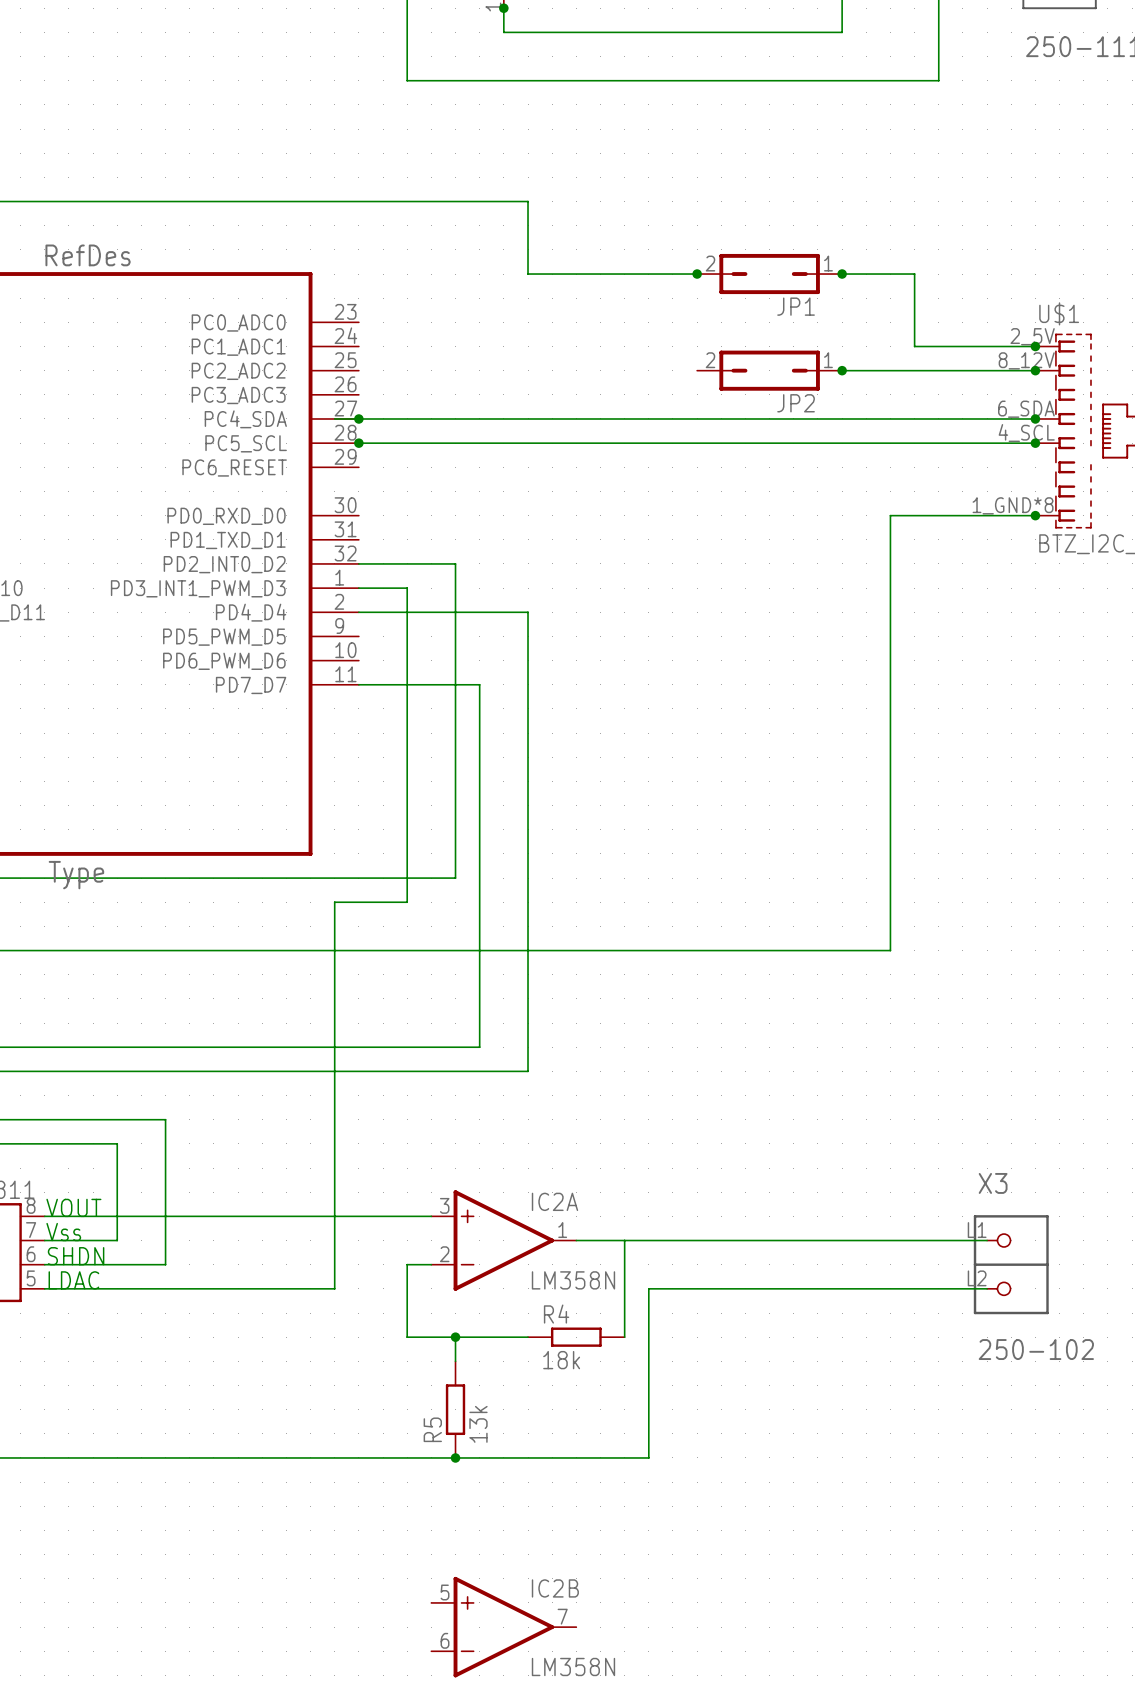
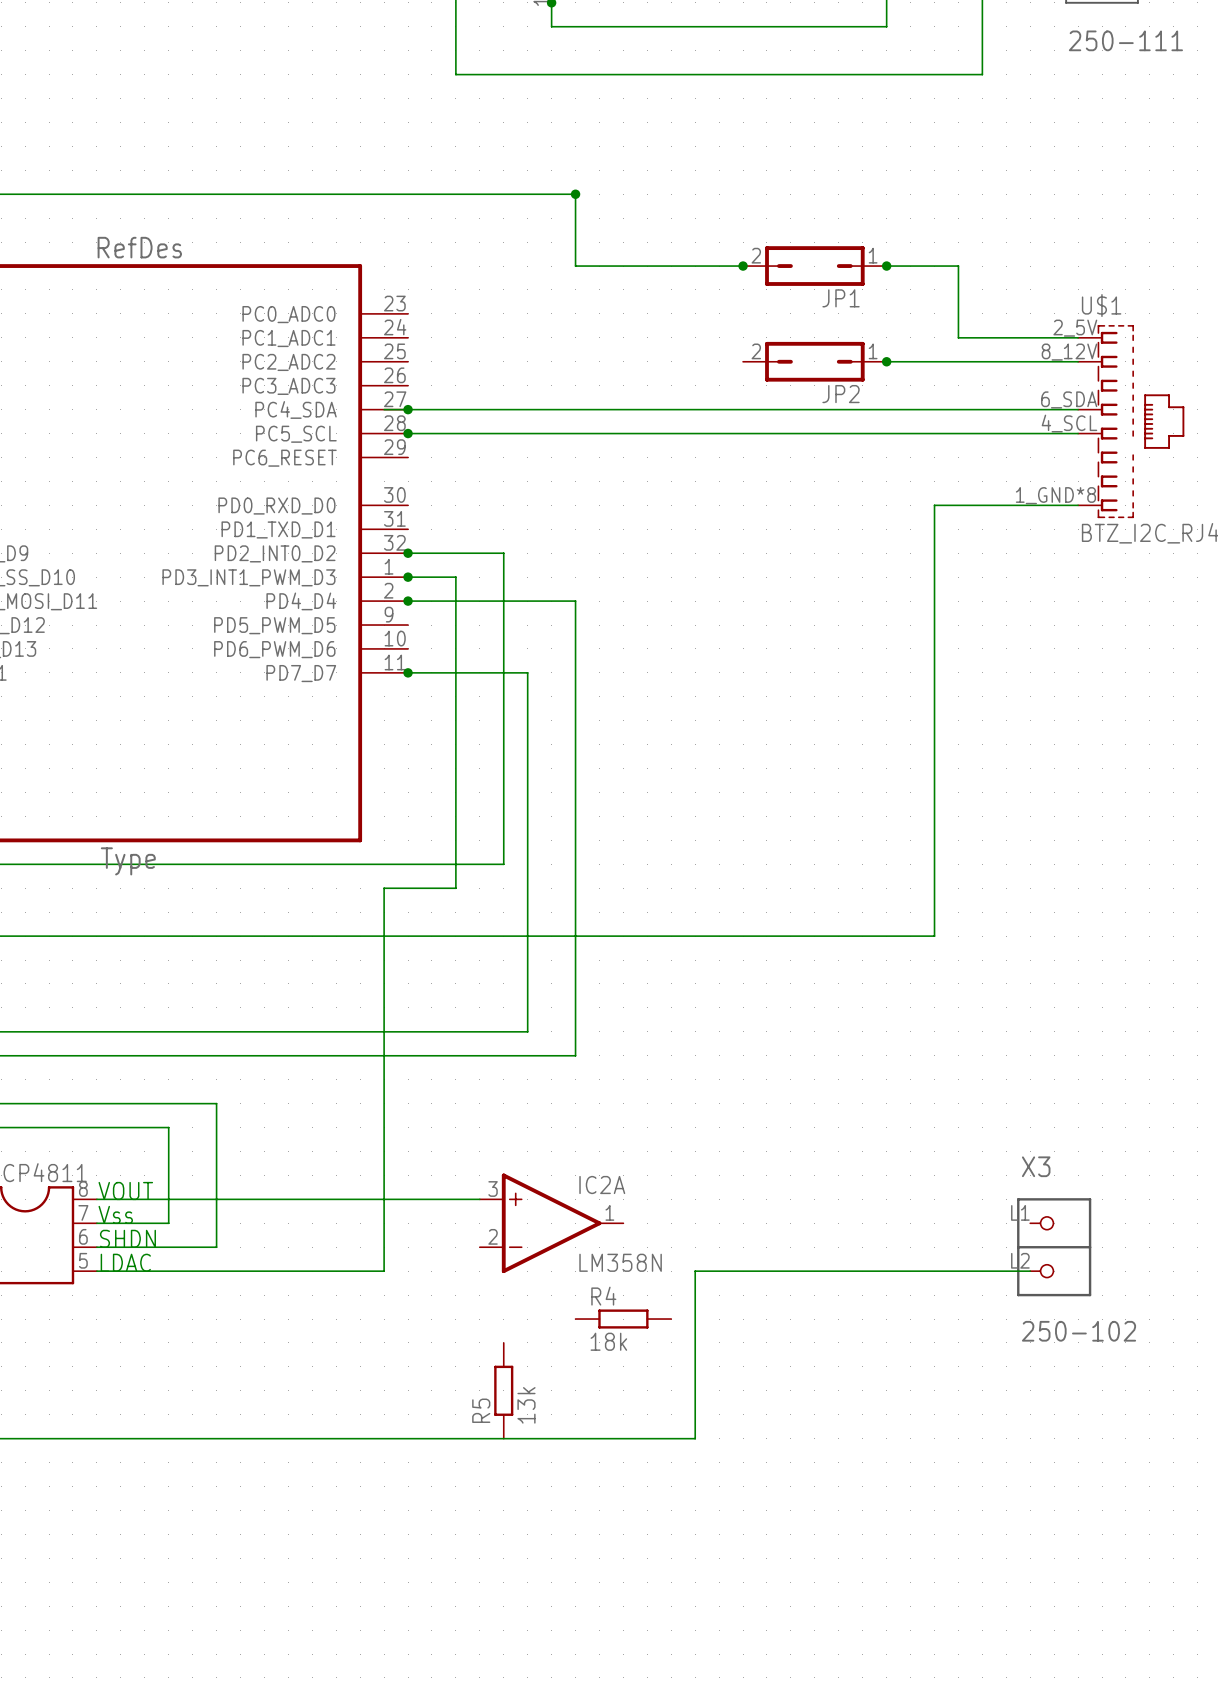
junction: none -> (575, 194)
junction: (1035, 346) -> none
junction: (1035, 370) -> none
junction: (1035, 418) -> none
junction: (1035, 443) -> none
junction: (1035, 515) -> none
junction: none -> (408, 553)
junction: none -> (408, 577)
junction: none -> (408, 601)
junction: none -> (408, 672)
wire: (576, 1240) (987, 1240) -> none
wire: (624, 1240) (624, 1337) -> none
wire: (431, 1264) (407, 1264) (407, 1337) (528, 1337) -> none
wire: (455, 1337) (455, 1361) -> none
junction: (455, 1337) -> none
junction: (455, 1457) -> none
IC2B: LM358N (503, 1627) -> none

